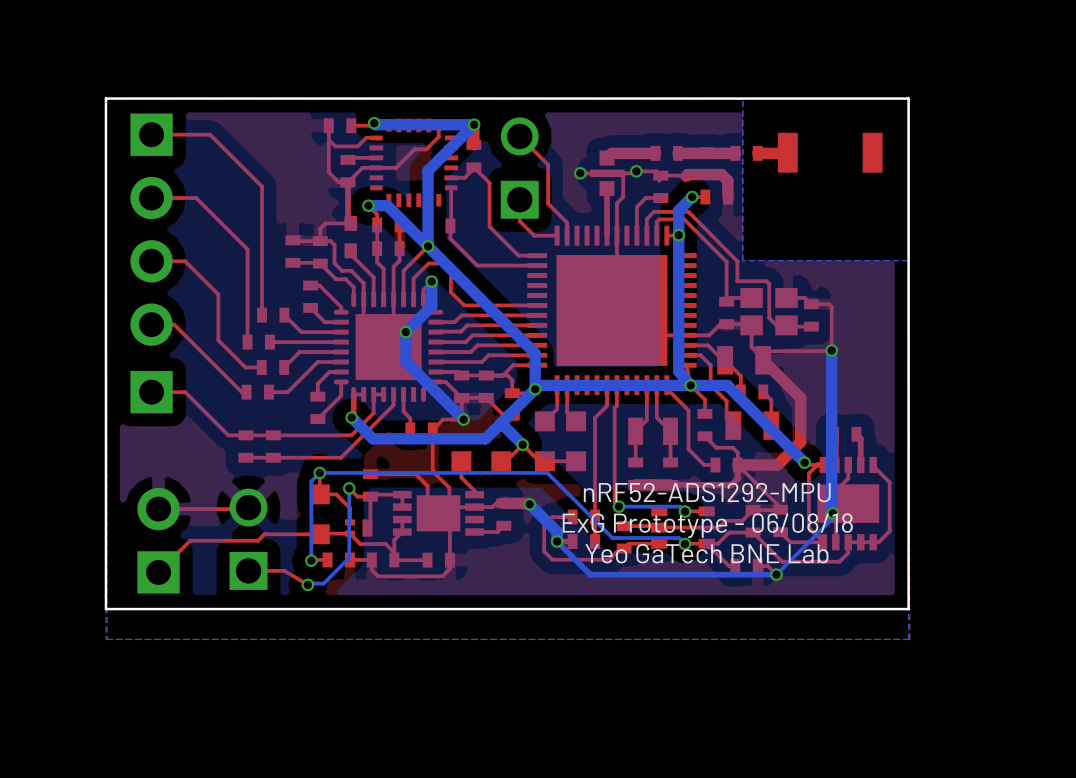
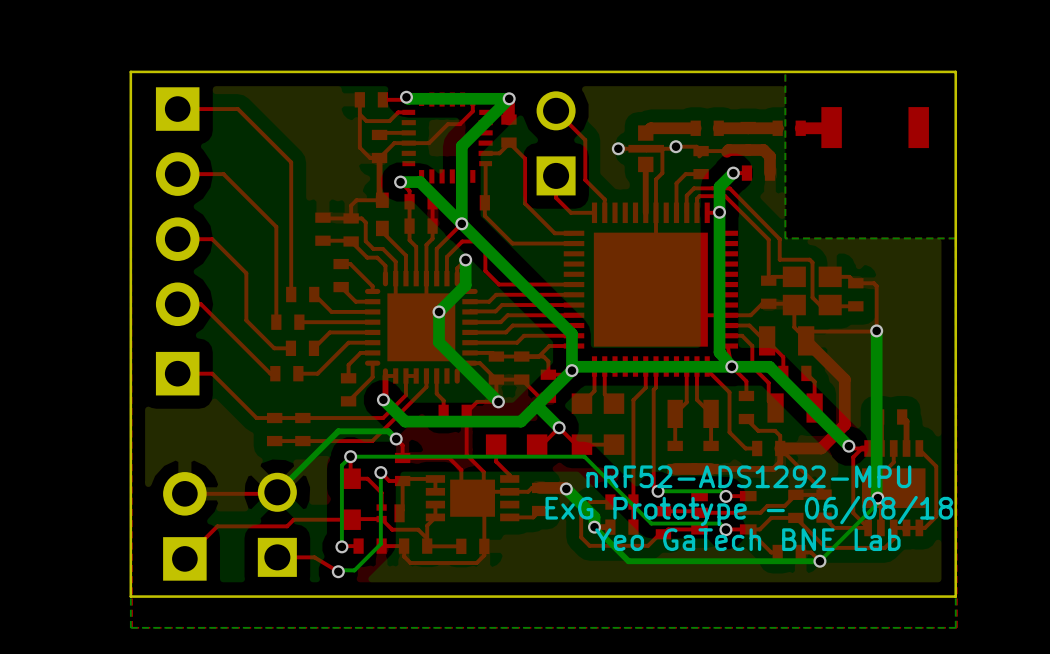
top track: none -> (396, 439) (402, 445) (402, 457)
bottom track: none -> (396, 439) (388, 431) (338, 431) (277, 492)
via: none -> (396, 439)

